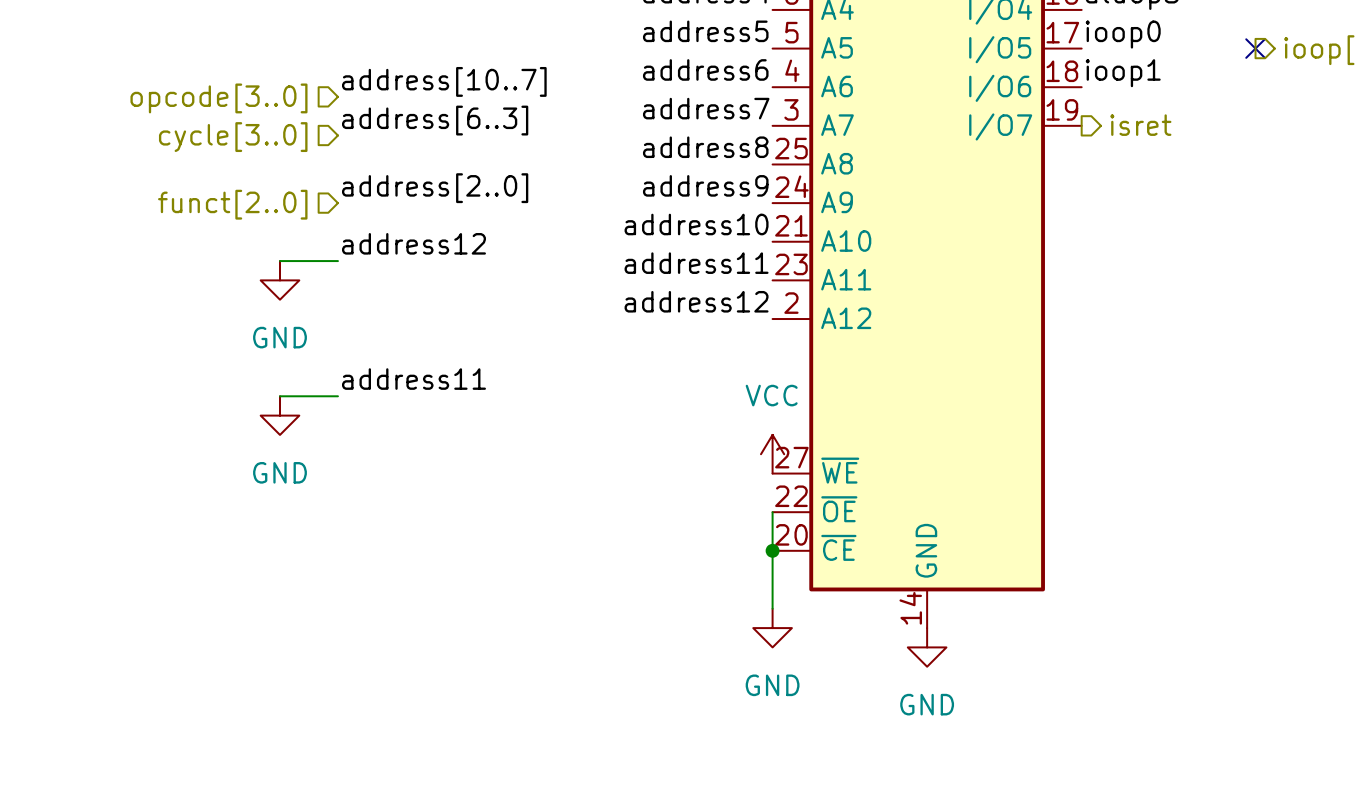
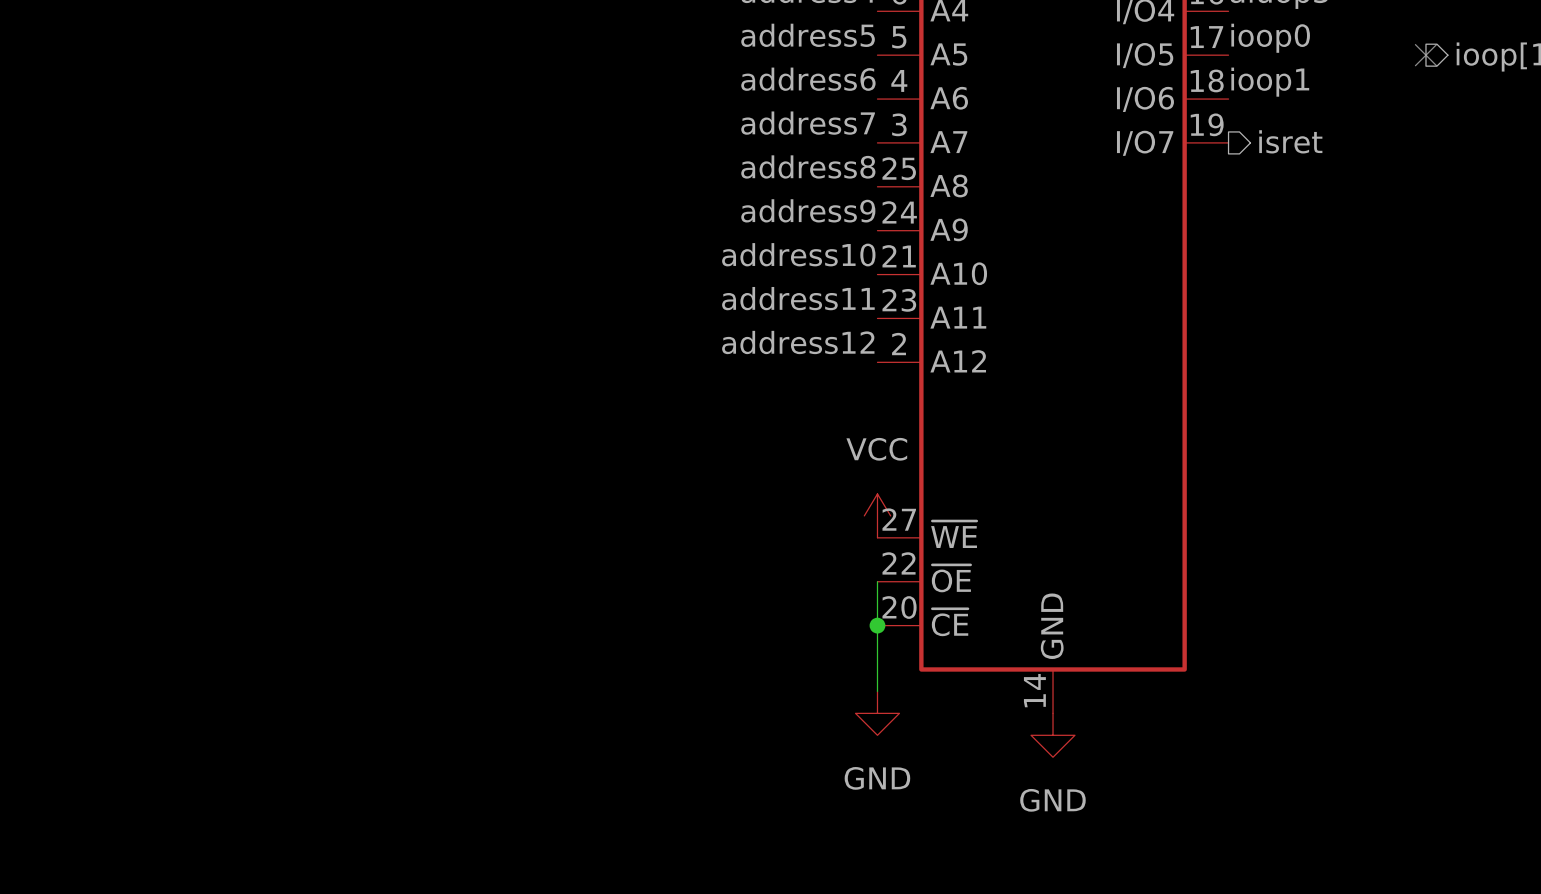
label: address[10..7] (444, 81) -> none
hierarchical label: opcode[3..0] (218, 98) -> none
label: address[6..3] (435, 120) -> none
hierarchical label: cycle[3..0] (233, 137) -> none
label: address[2..0] (435, 188) -> none
hierarchical label: funct[2..0] (232, 204) -> none
label: address12 (413, 243) -> none
wire: (280, 261) (337, 261) -> none
power symbol: GND (280, 280) -> none
label: address11 (413, 379) -> none
wire: (280, 396) (337, 396) -> none
power symbol: GND (280, 415) -> none

